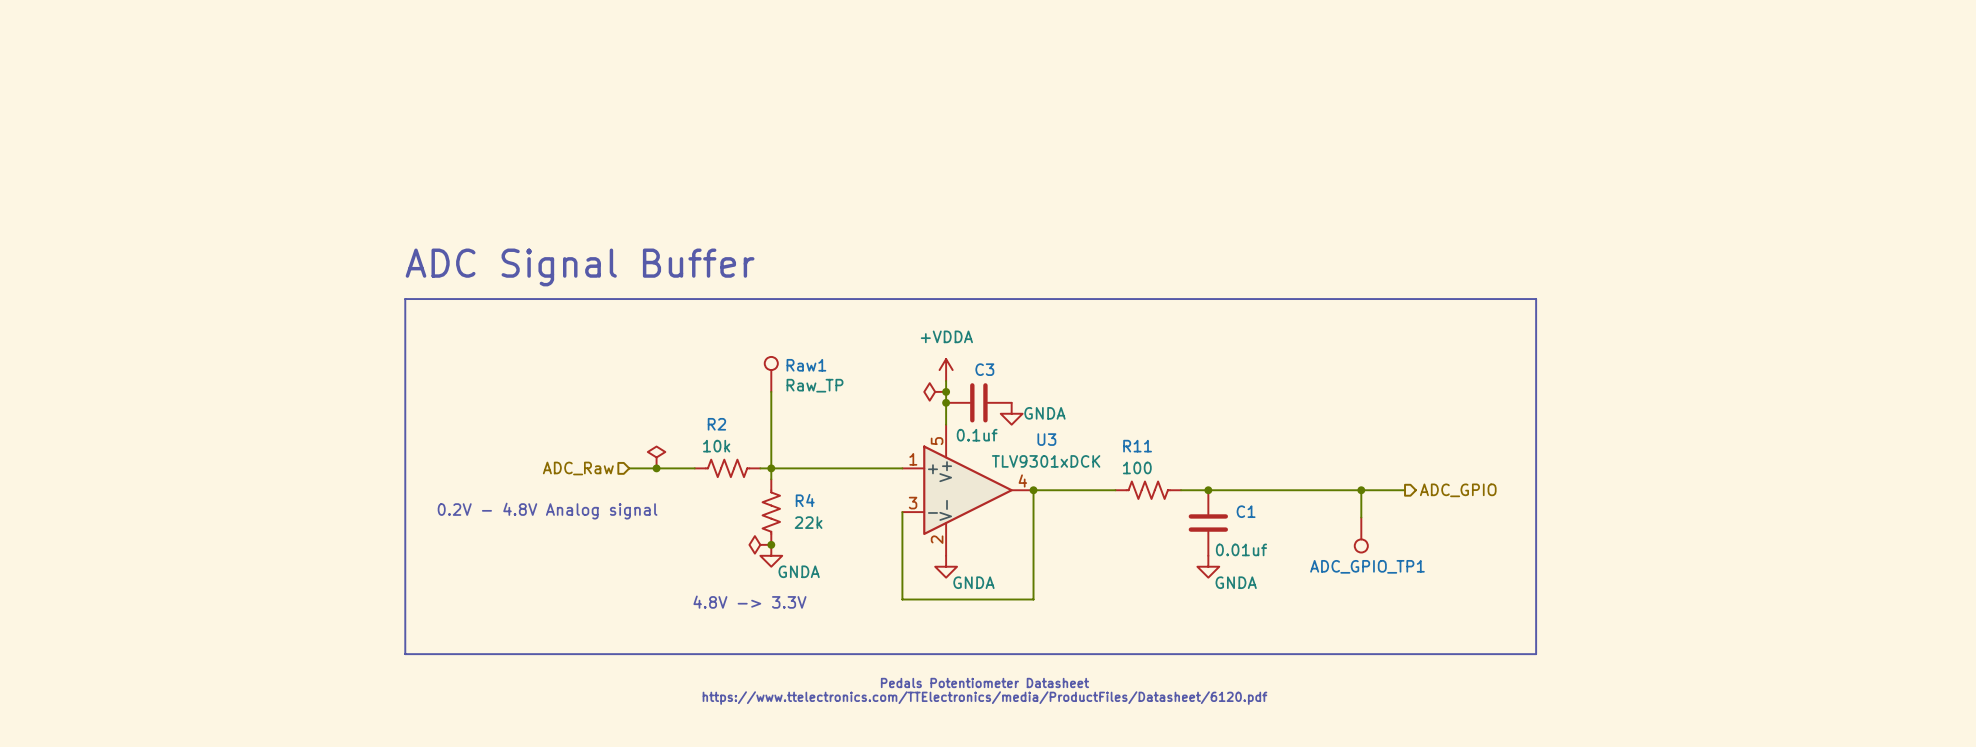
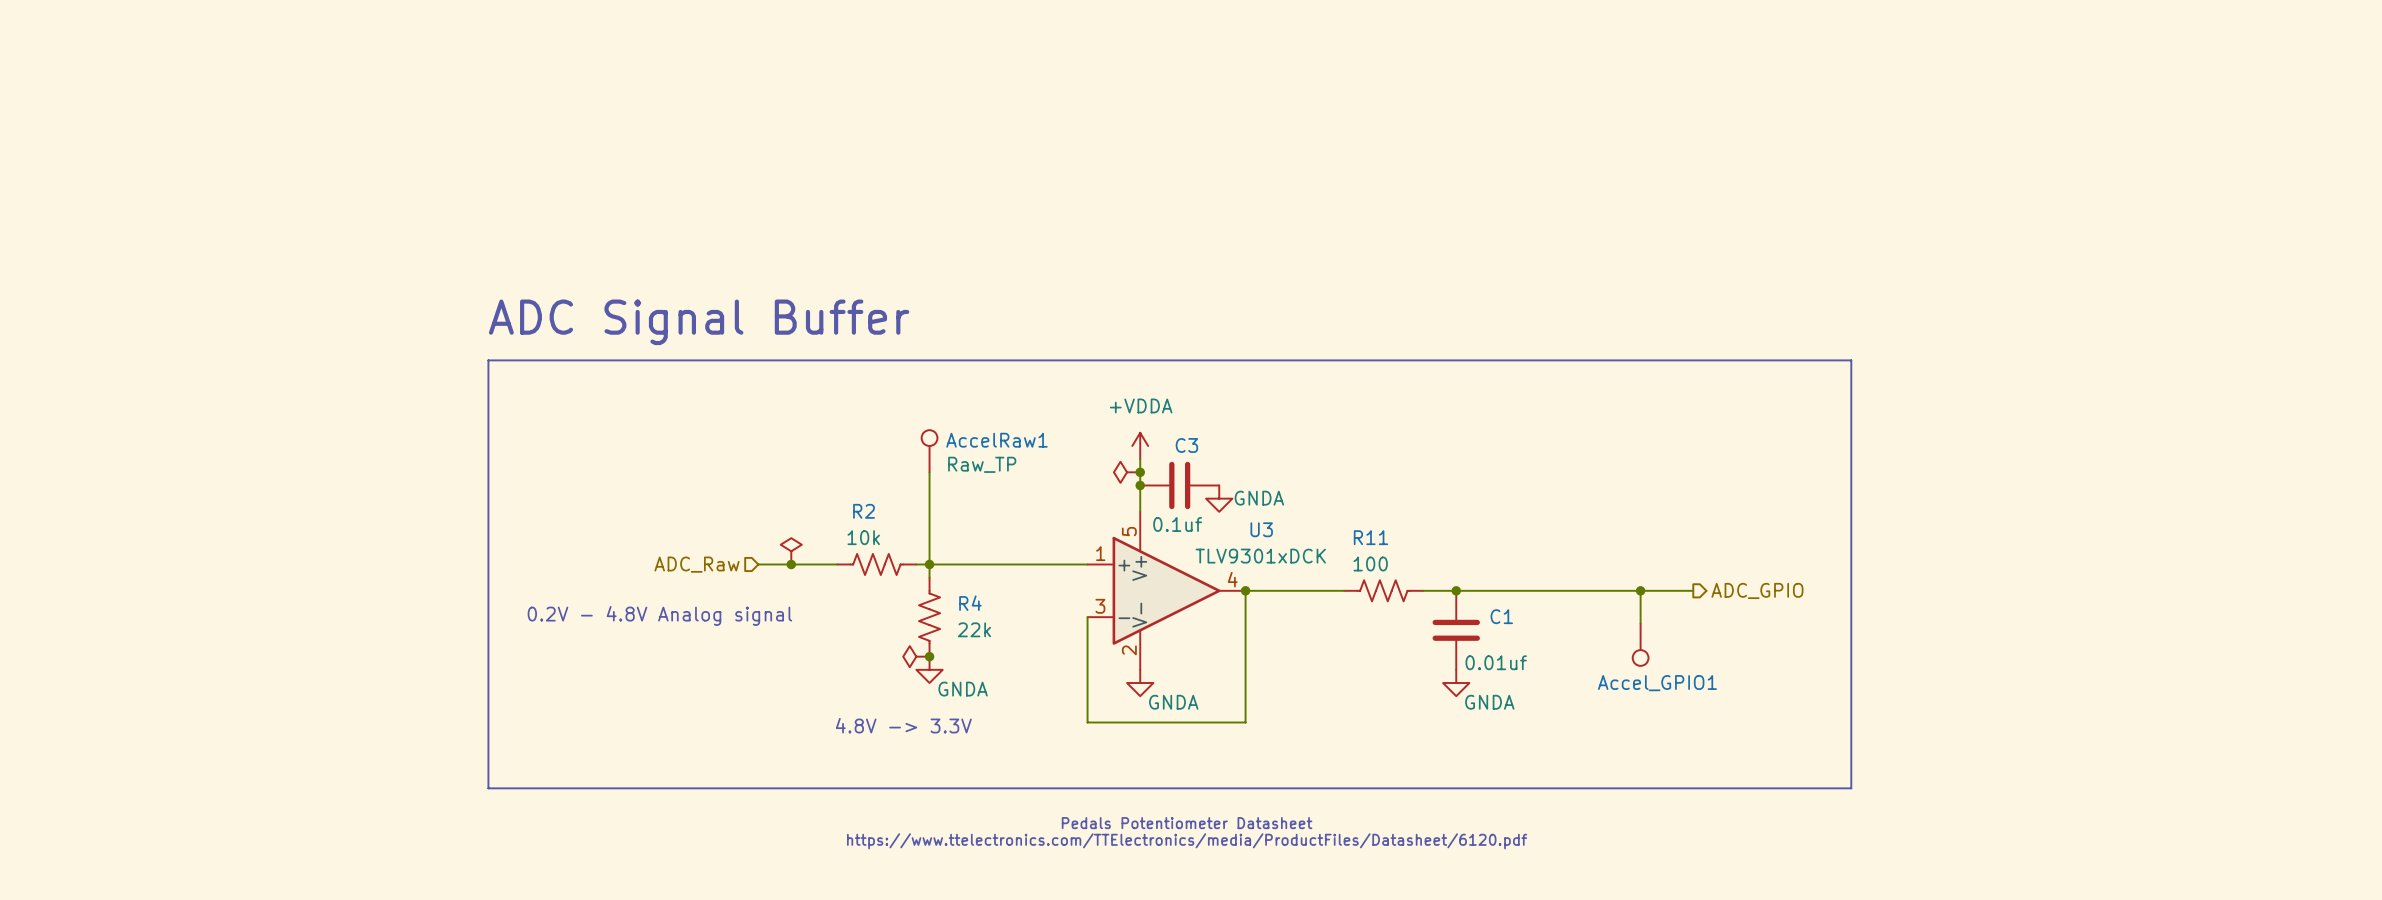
Raw1 name: Raw1 (806, 365) -> AccelRaw1 (996, 440)
ADC_GPIO_TP1 name: ADC_GPIO_TP1 (1367, 566) -> Accel_GPIO1 (1657, 683)

